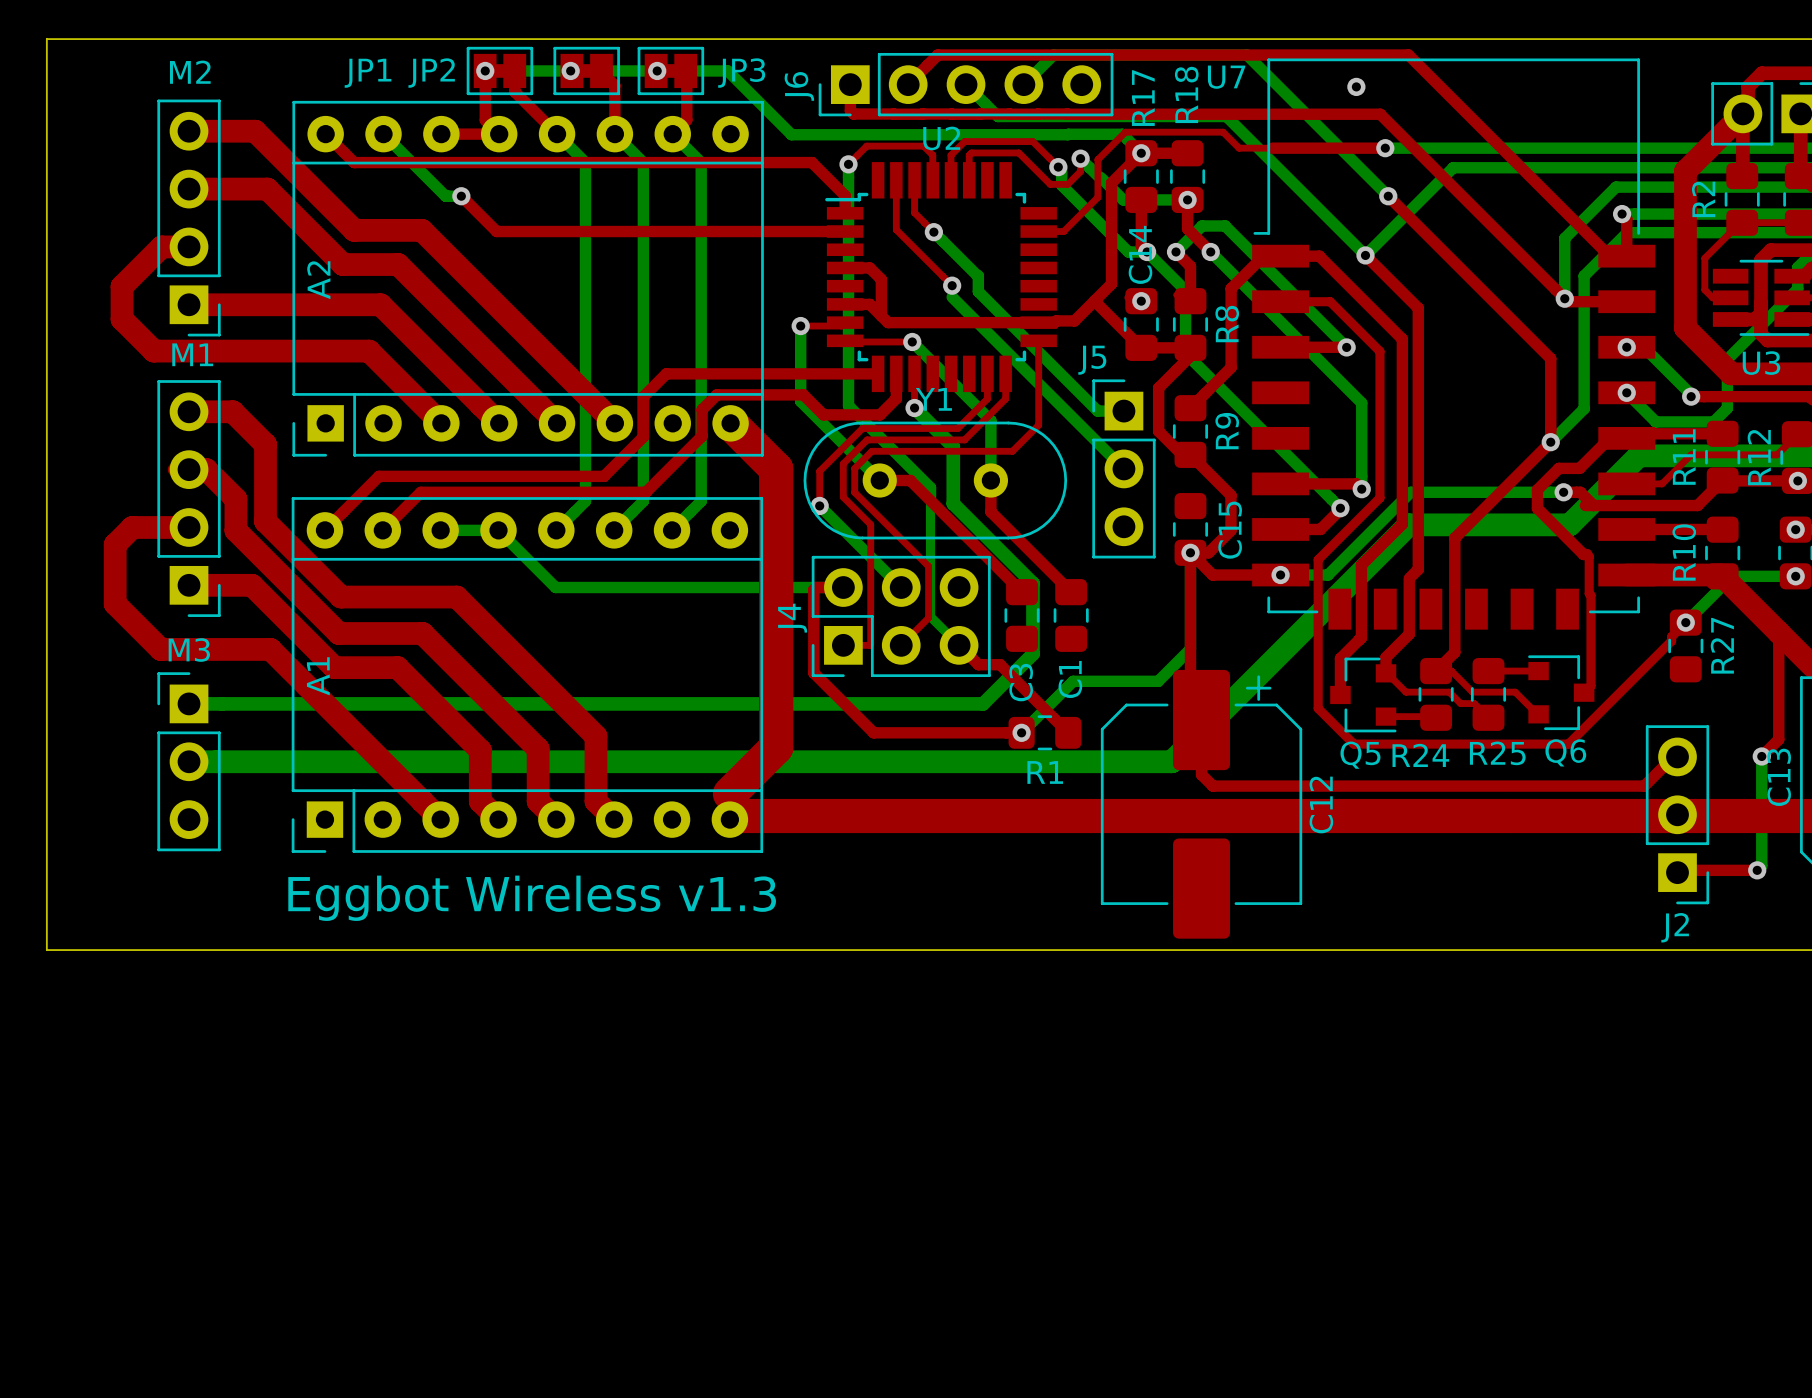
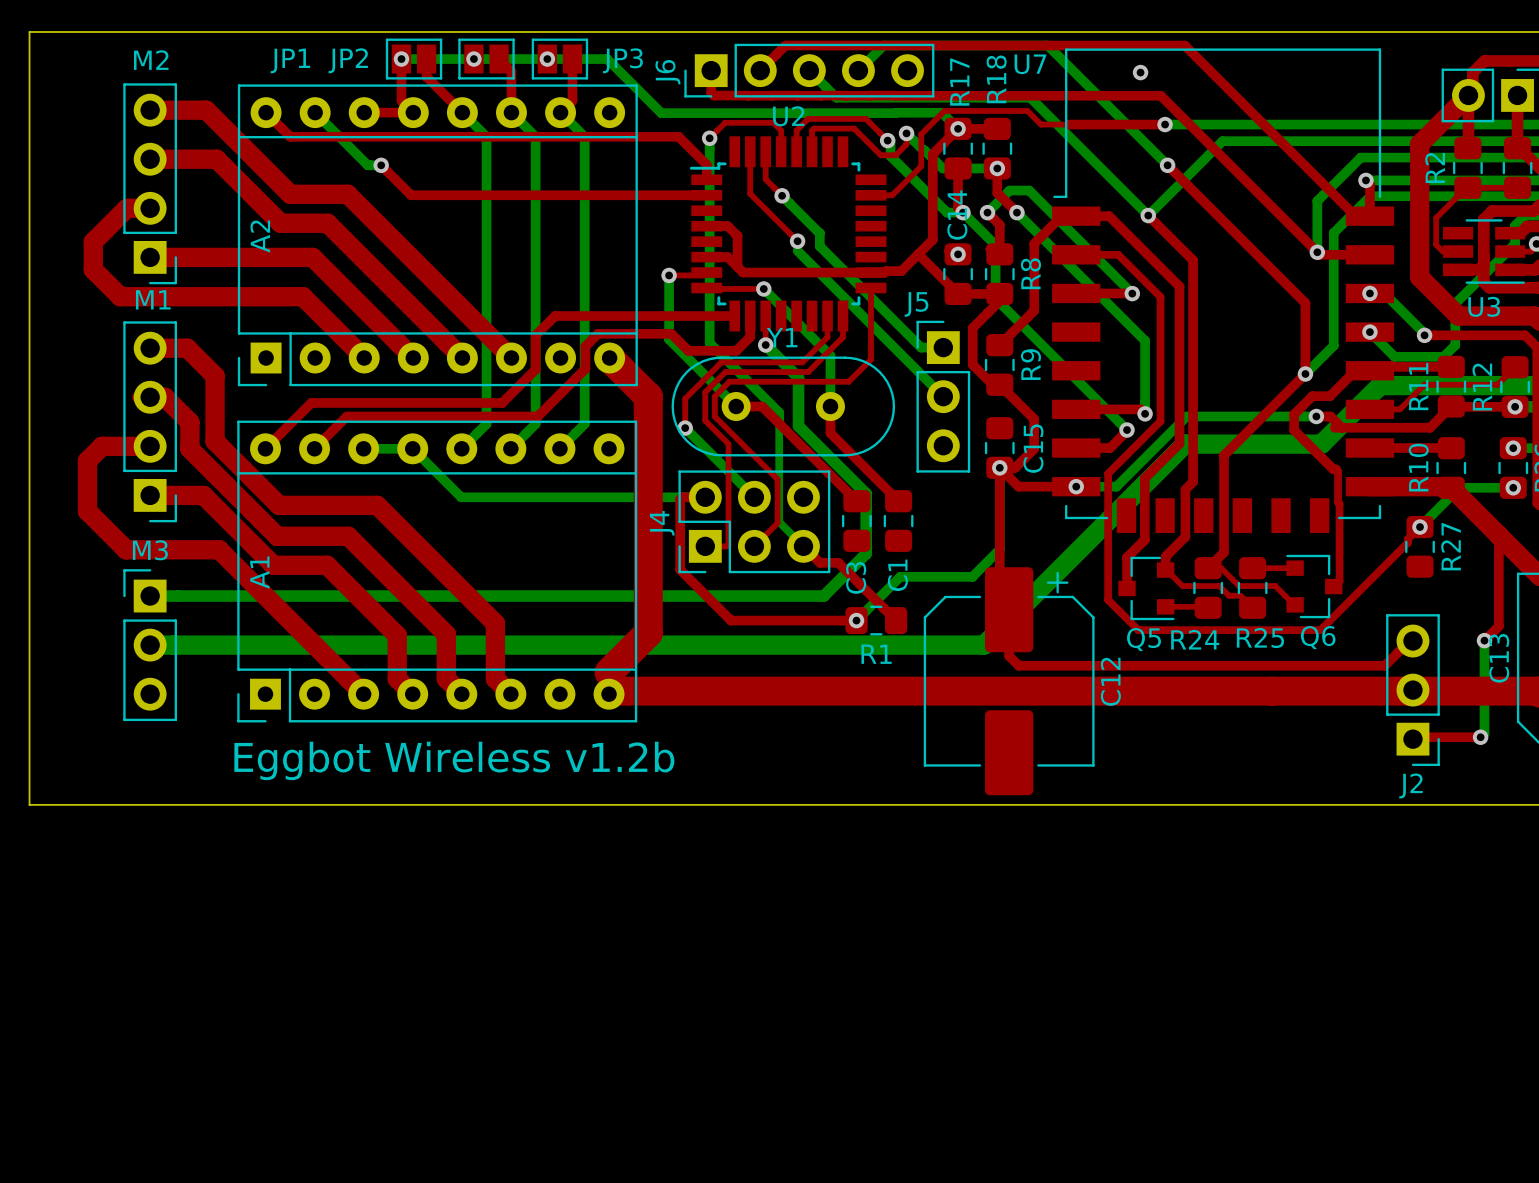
JP1 footprint: [466, 46, 534, 96] -> [385, 38, 443, 80]
JP2 footprint: [553, 46, 620, 96] -> [458, 38, 515, 80]
JP3 footprint: [637, 46, 705, 96] -> [531, 38, 589, 80]
text: Eggbot Wireless v1.3 (532, 898) -> Eggbot Wireless v1.2b (454, 760)

